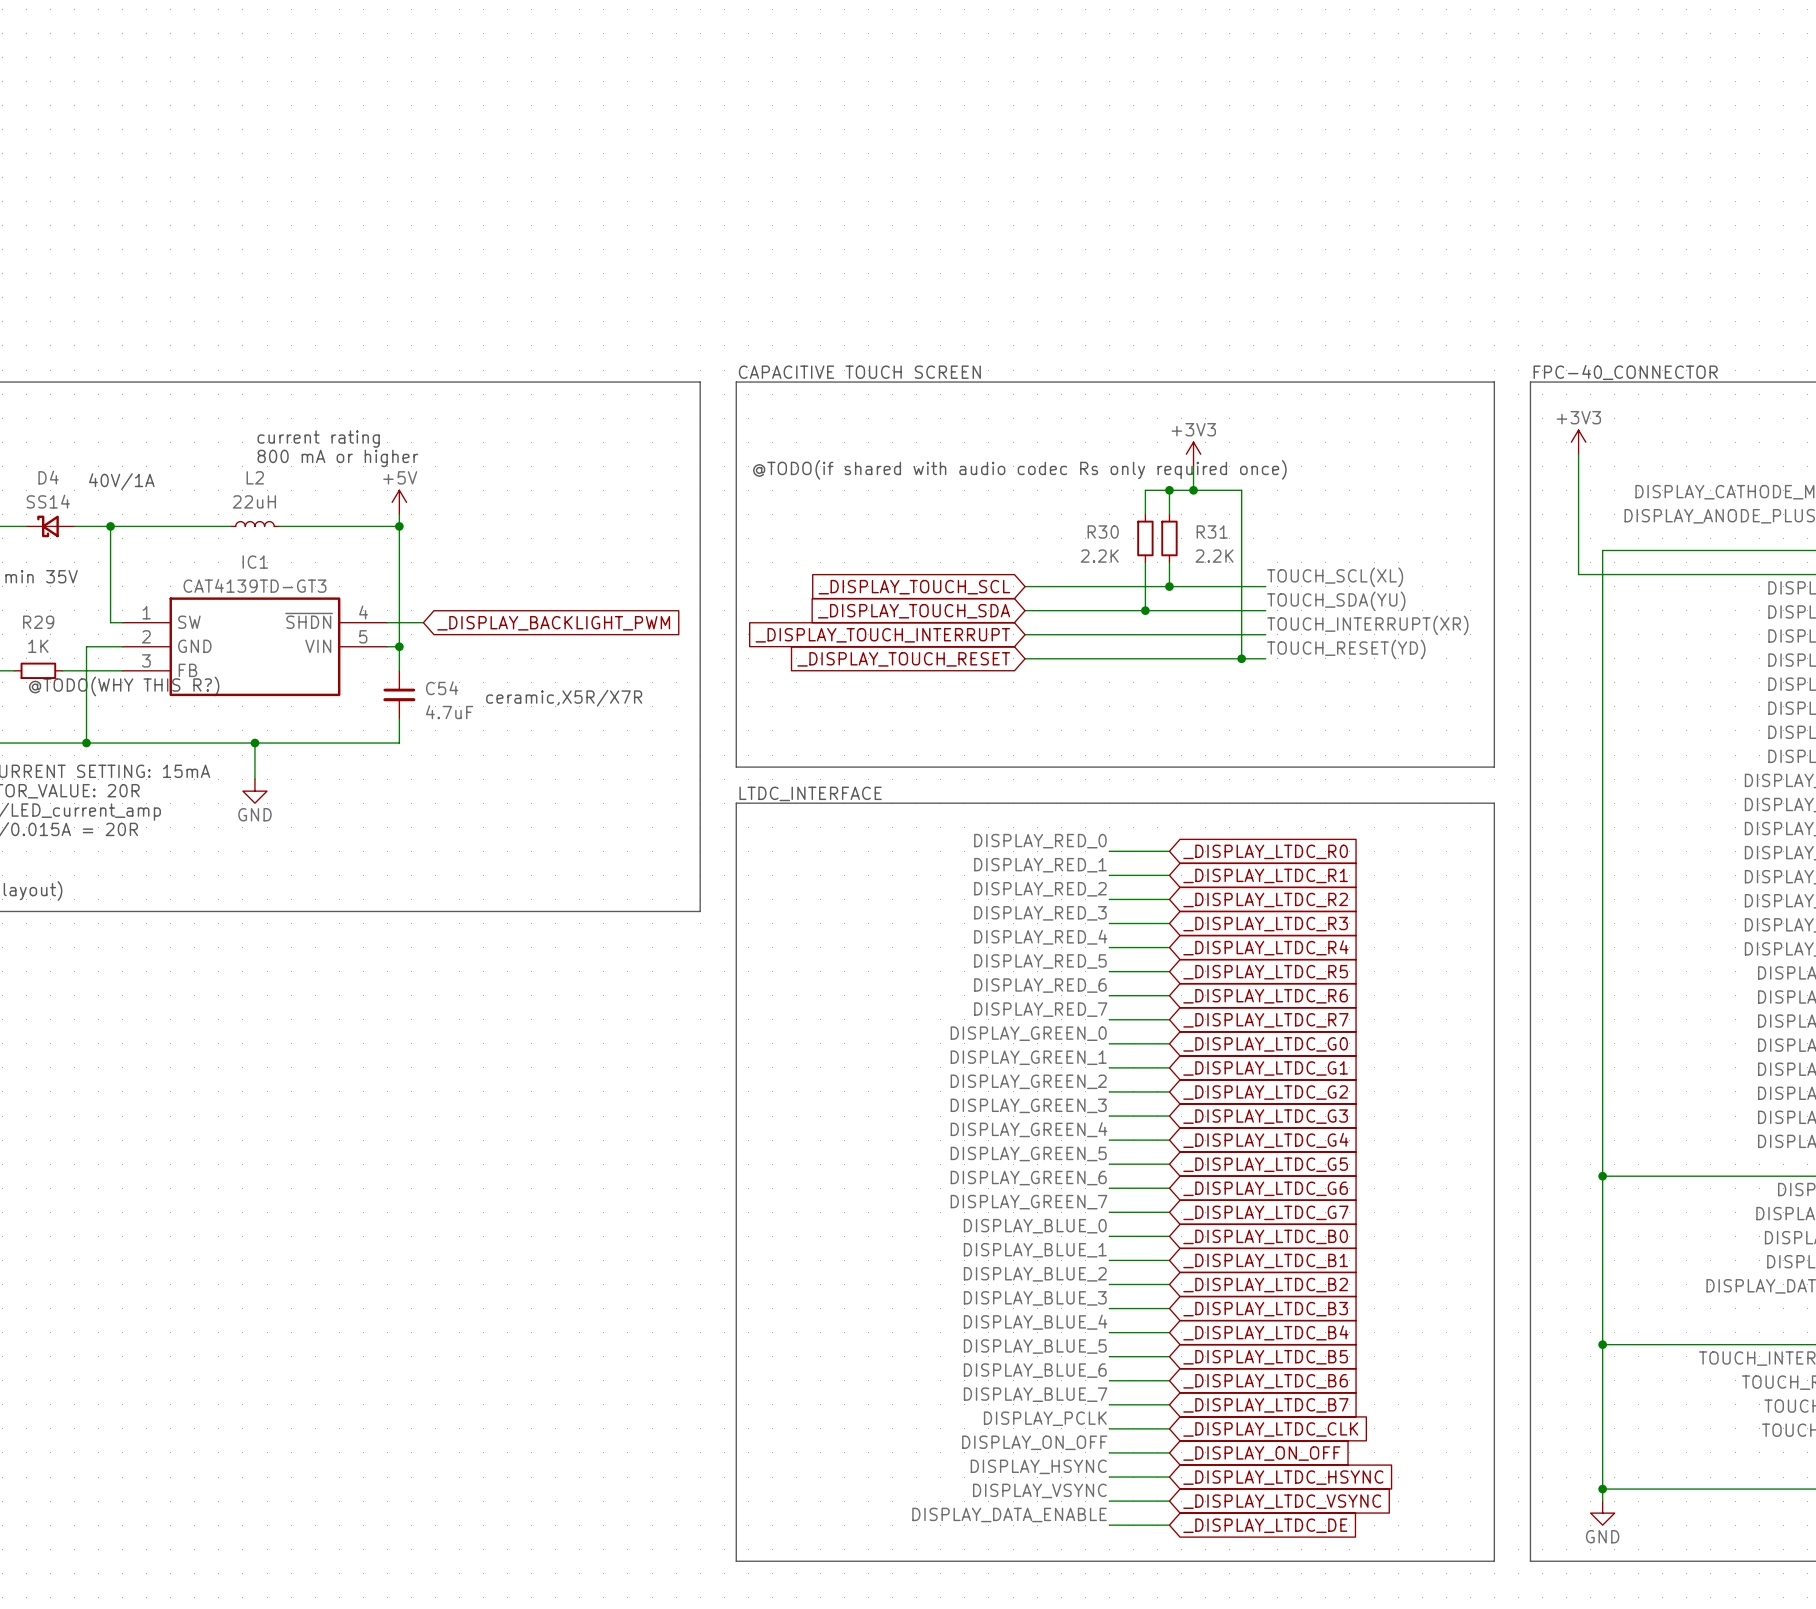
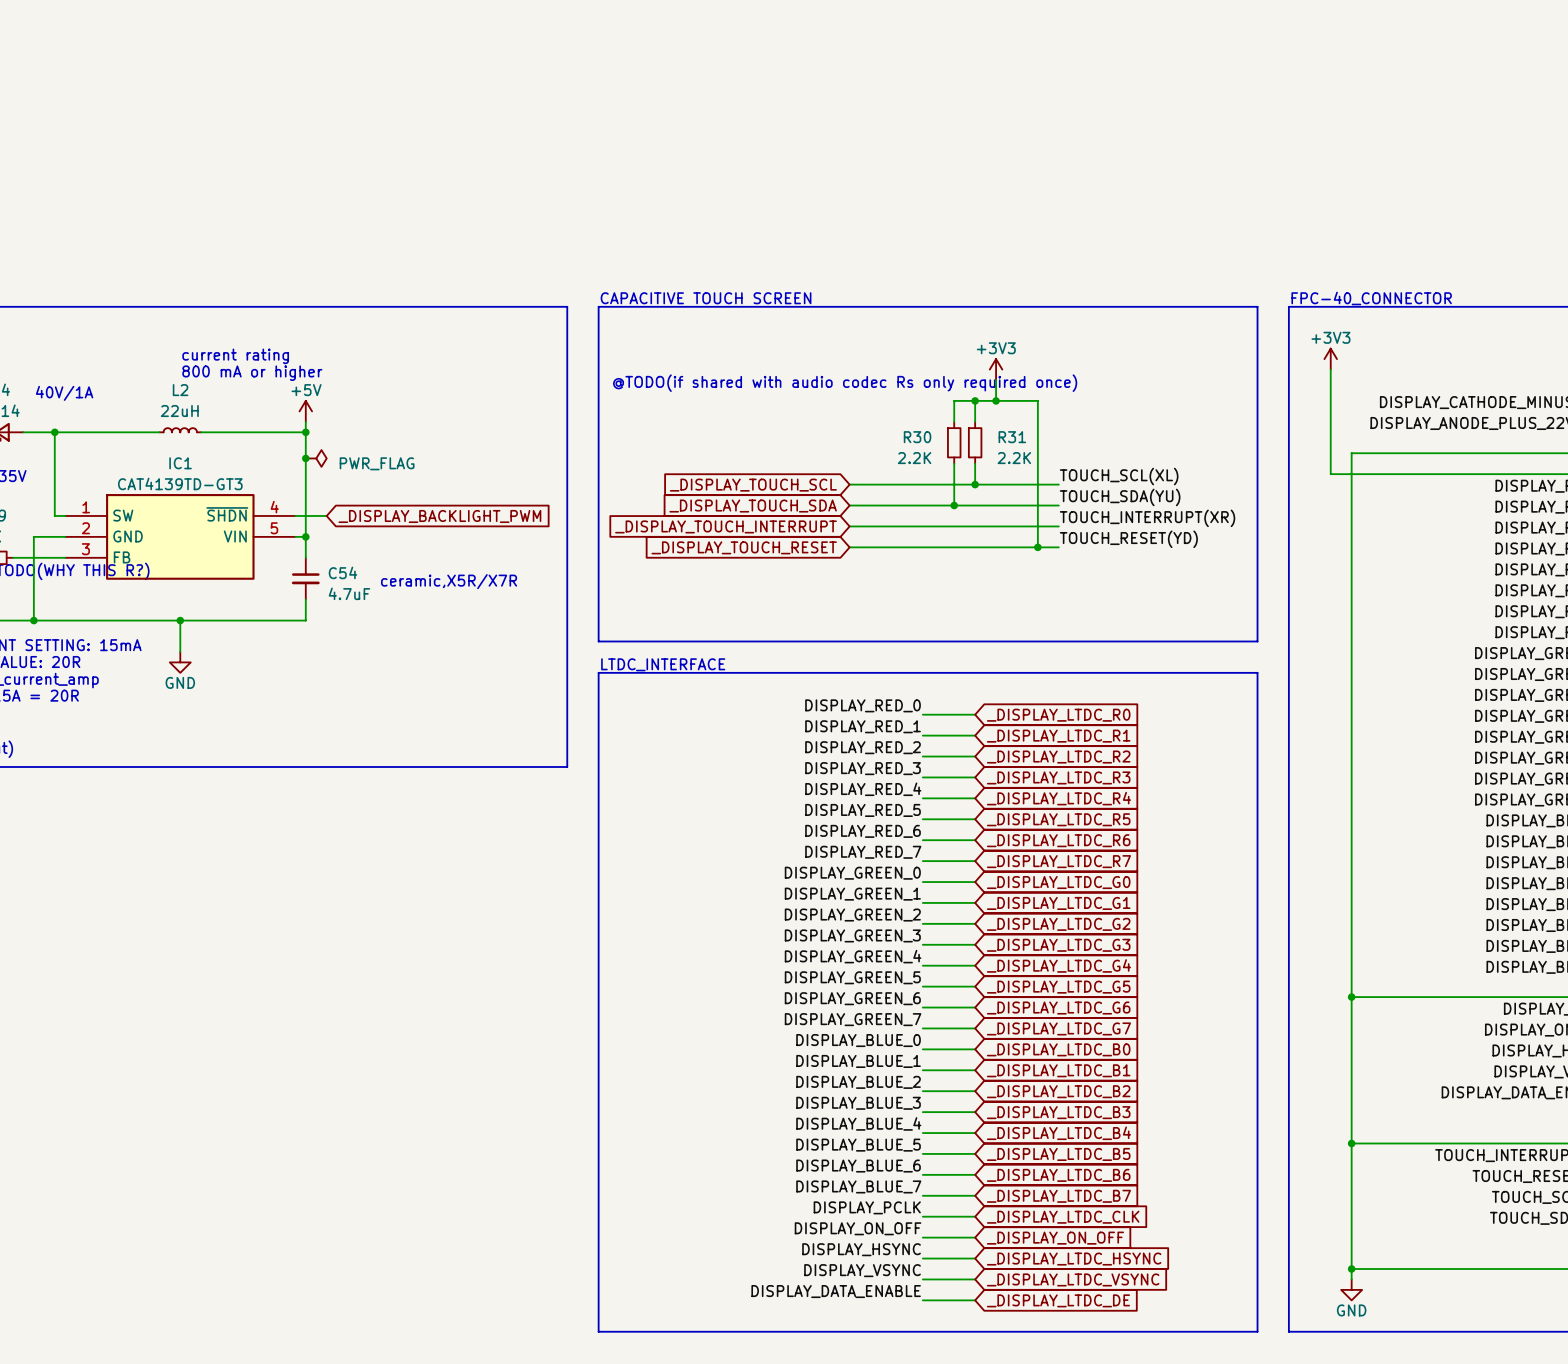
junction: none -> (305, 458)
power symbol: none -> PWR_FLAG (316, 458)

